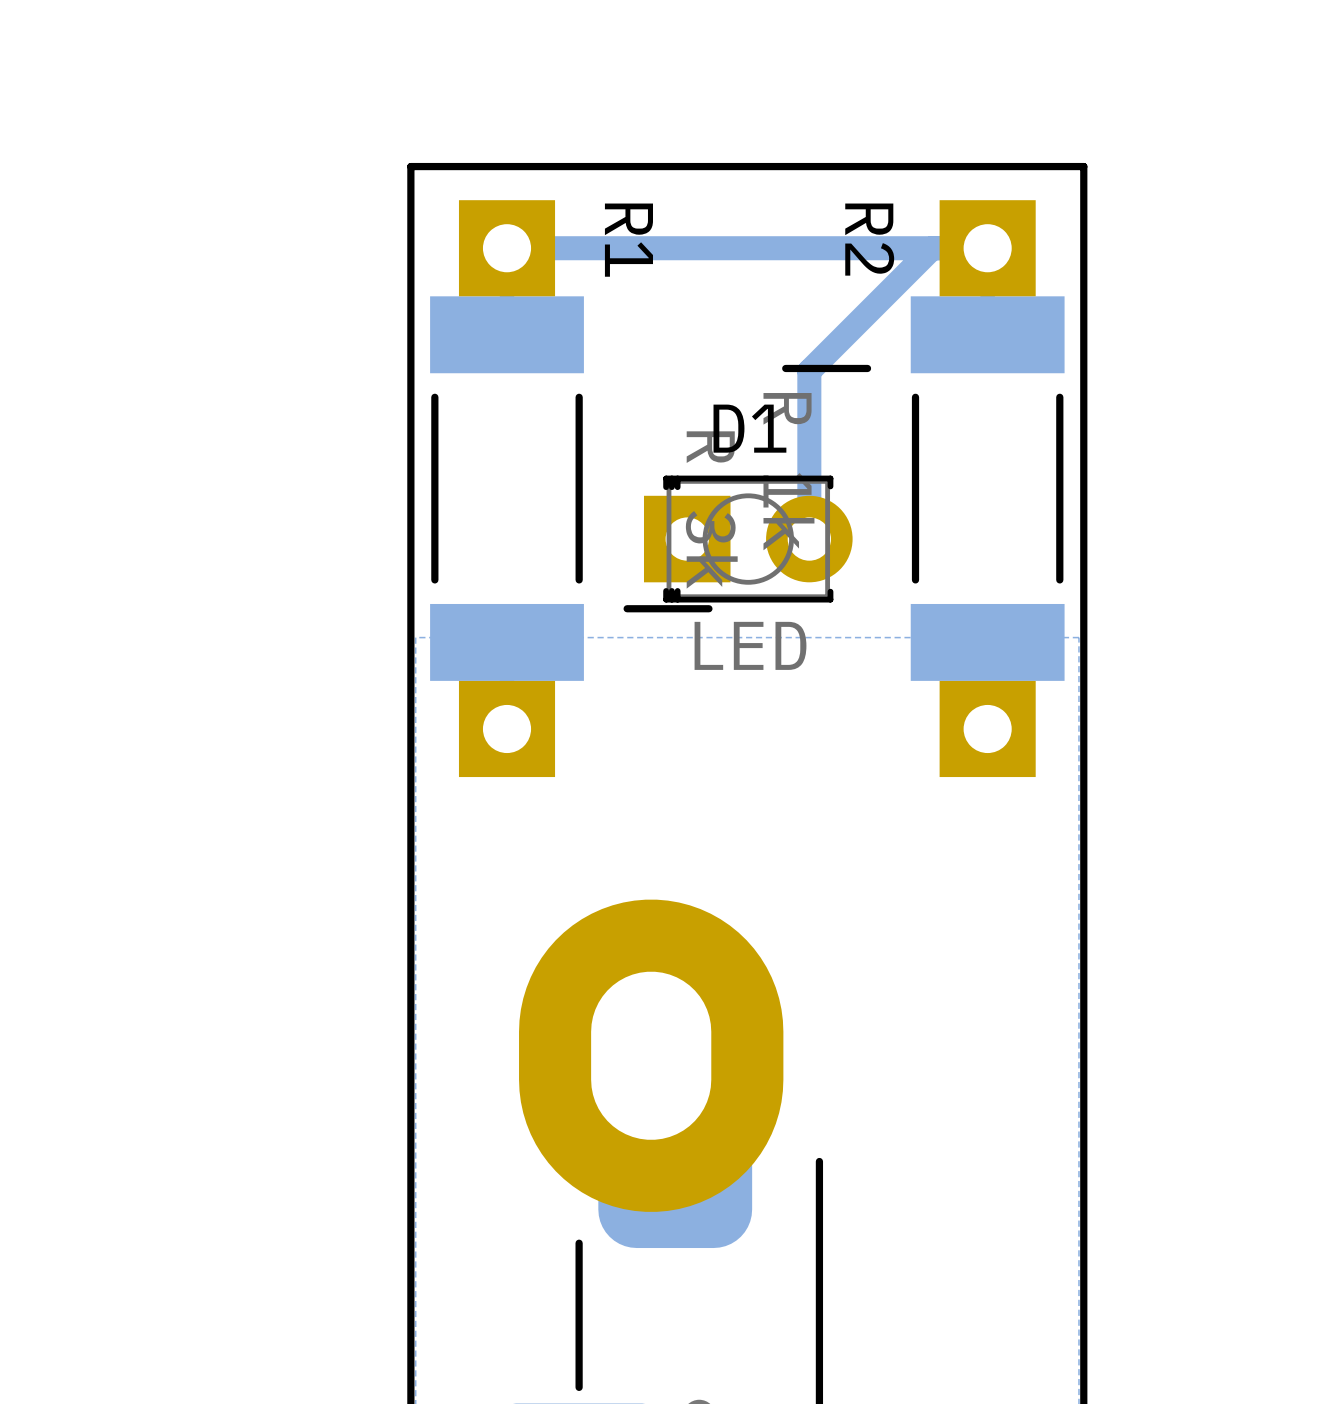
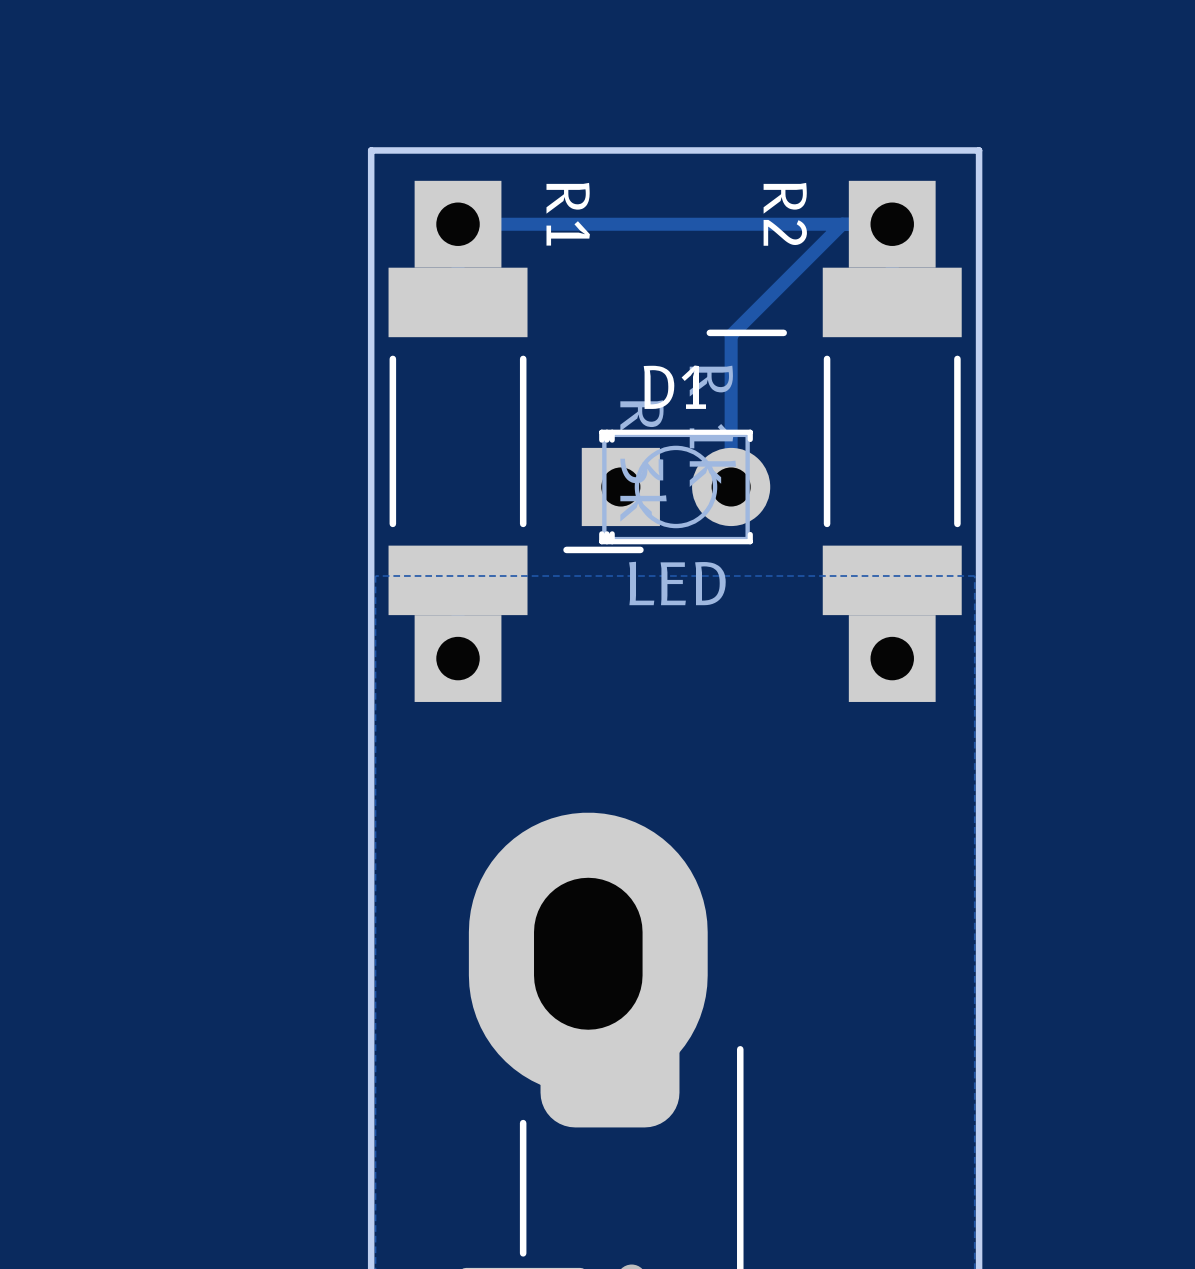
track width: thick (932, 248) (809, 371) (809, 539) -> thin (842, 224) (731, 335) (731, 486)
track width: thick (987, 248) (507, 248) -> thin (892, 224) (458, 224)

